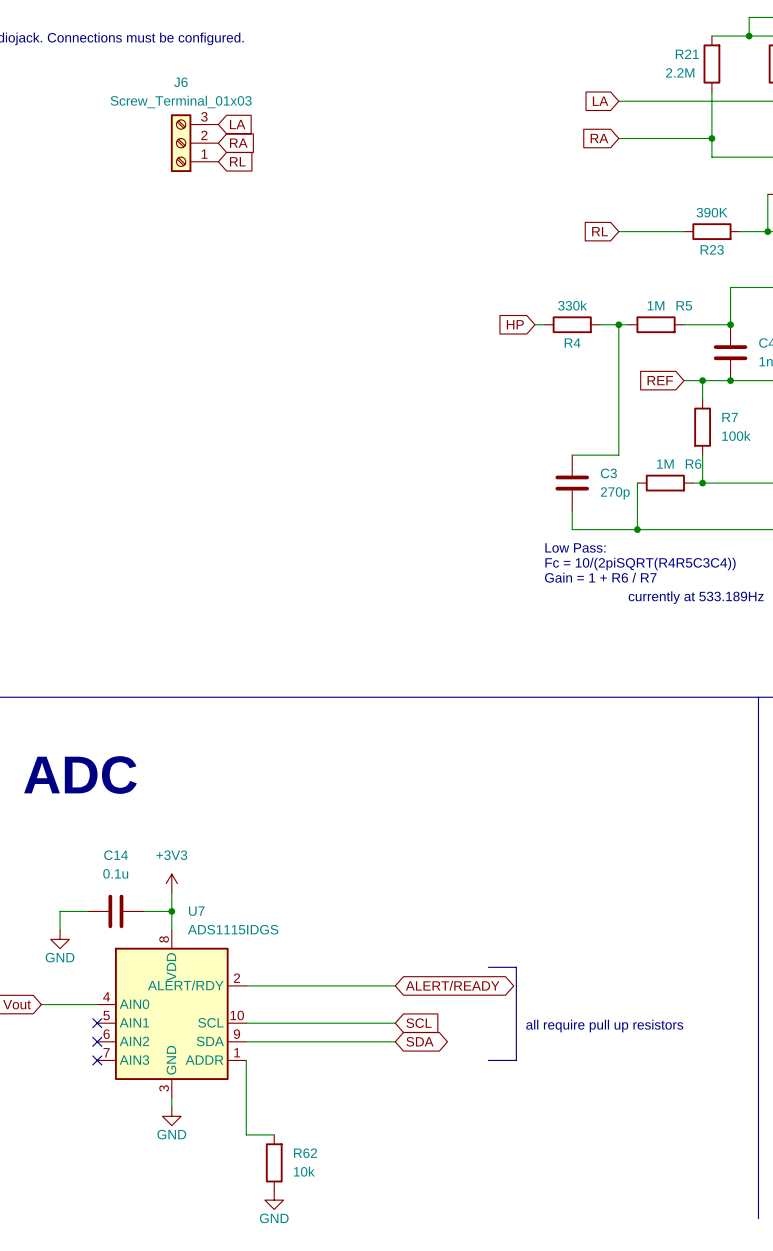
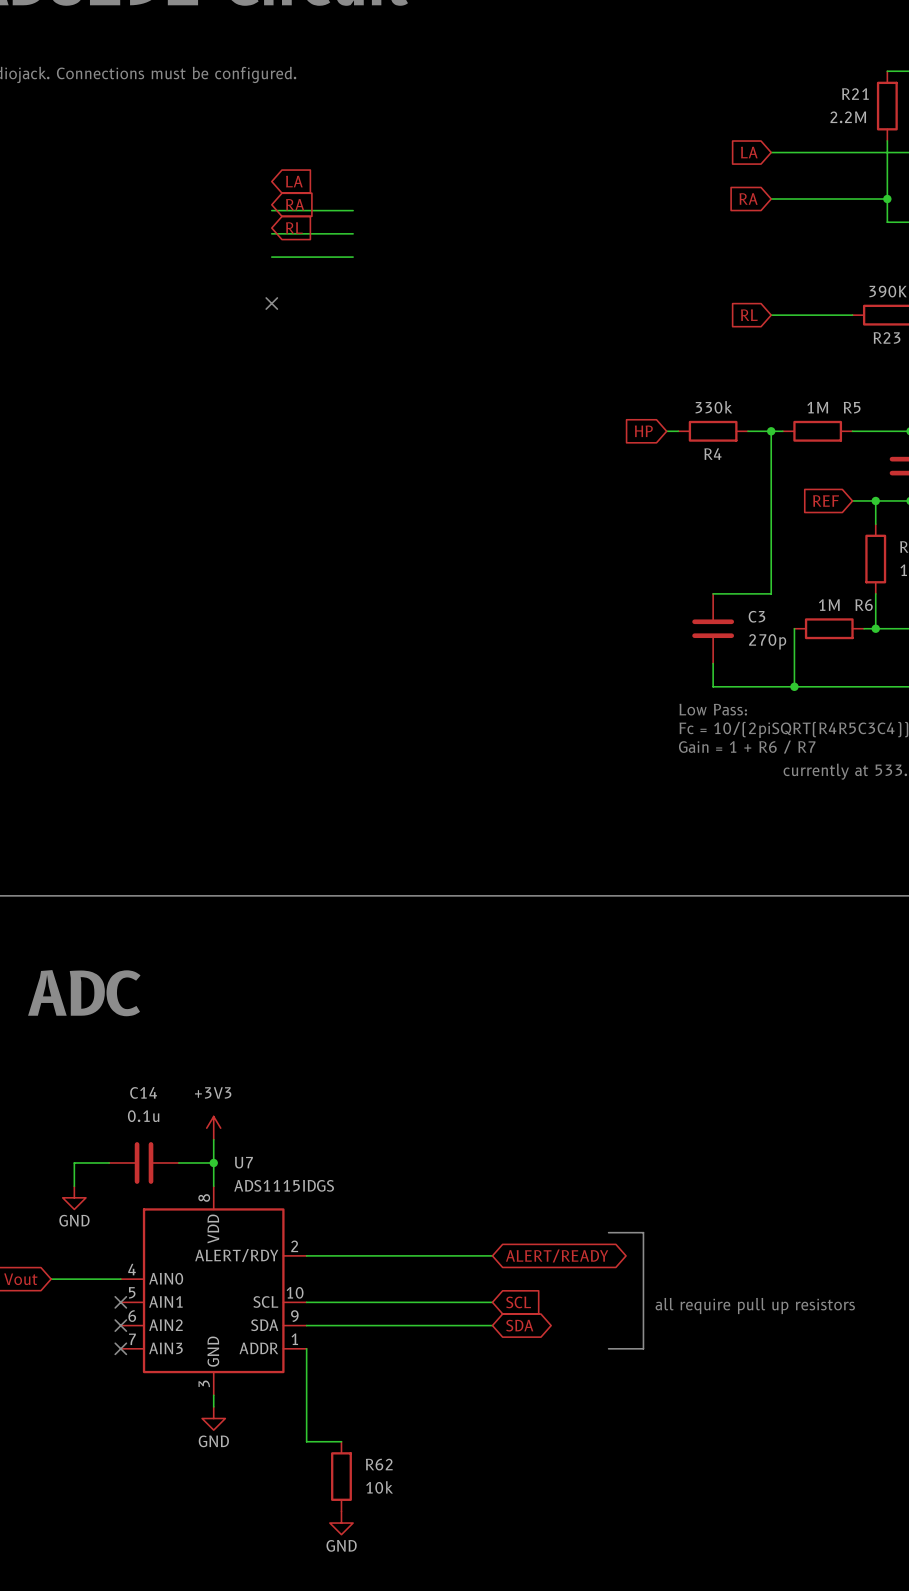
J6: Screw_Terminal_01x03 (194, 143) -> none
wire: none -> (271, 210) (353, 210)
wire: none -> (271, 233) (353, 233)
wire: none -> (271, 257) (353, 257)
no-connect mark: none -> (271, 303)

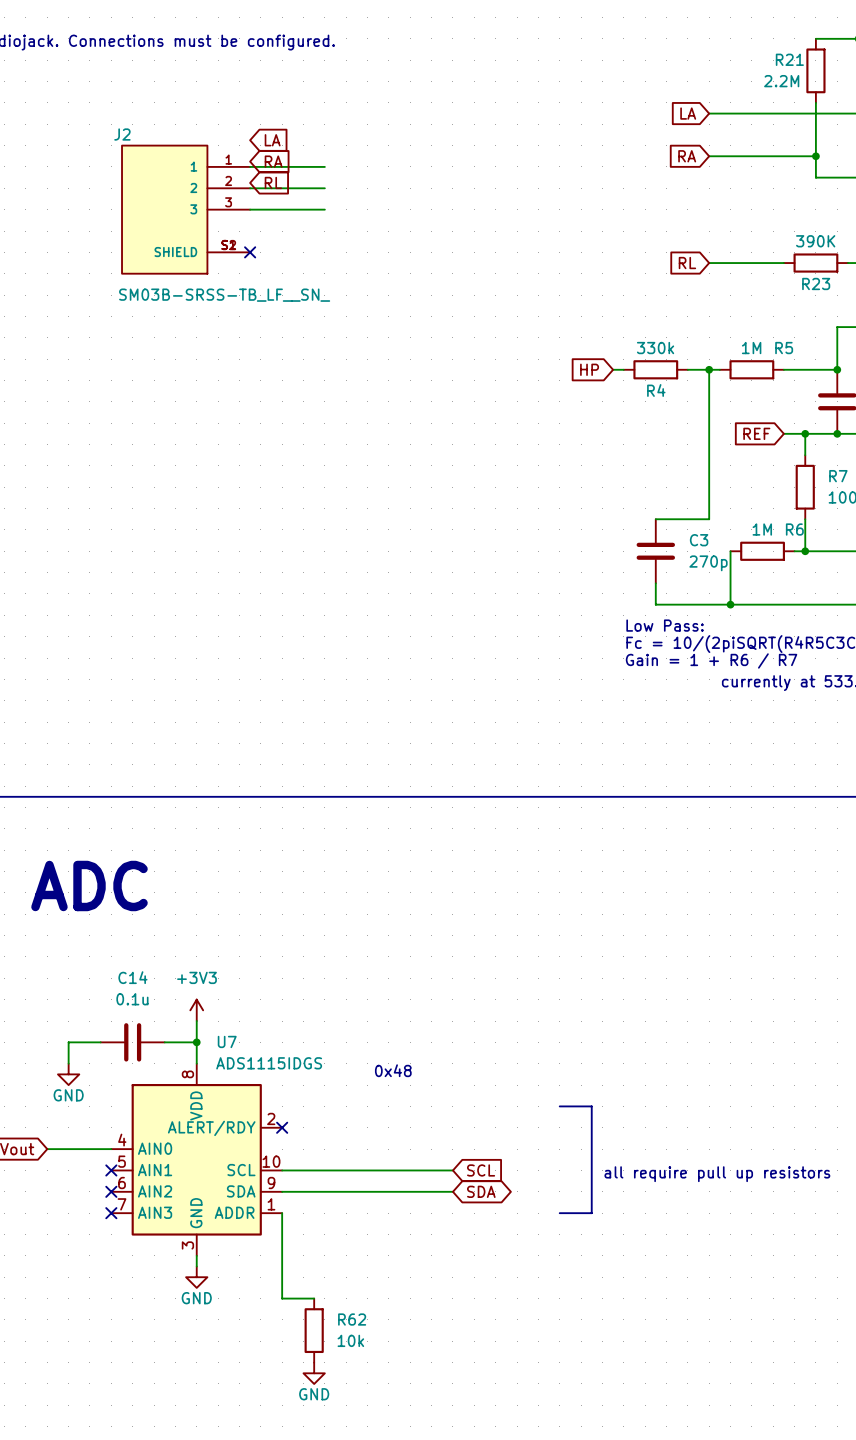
J2: none -> SM03B-SRSS-TB_LF__SN_ (185, 209)
text: none -> 0x48 (393, 1070)
wire: (306, 1255) (492, 1255) -> none
no-connect mark: none -> (282, 1127)
global label: ALERT/READY (557, 1255) -> none

